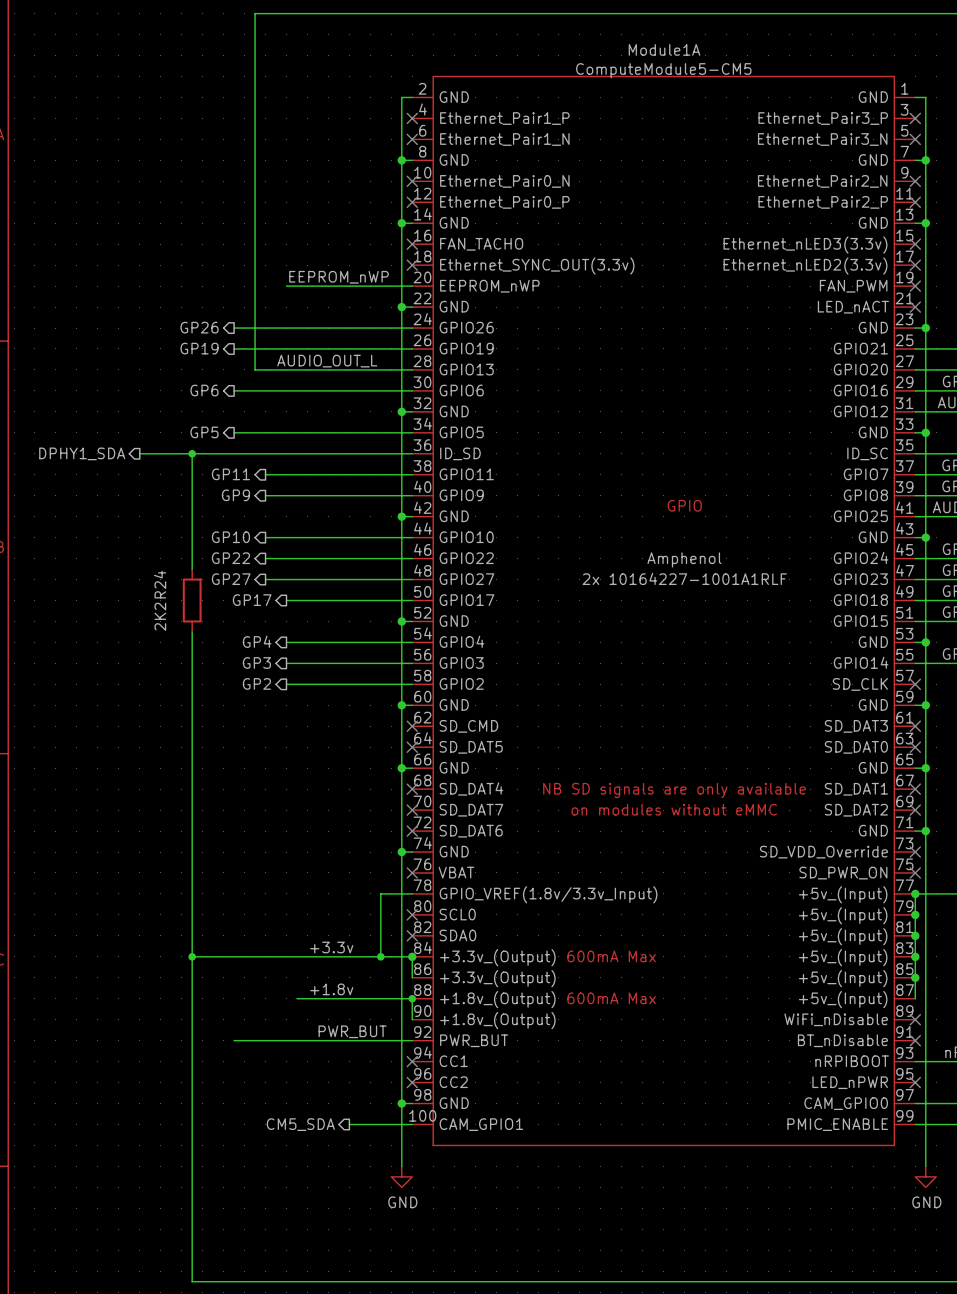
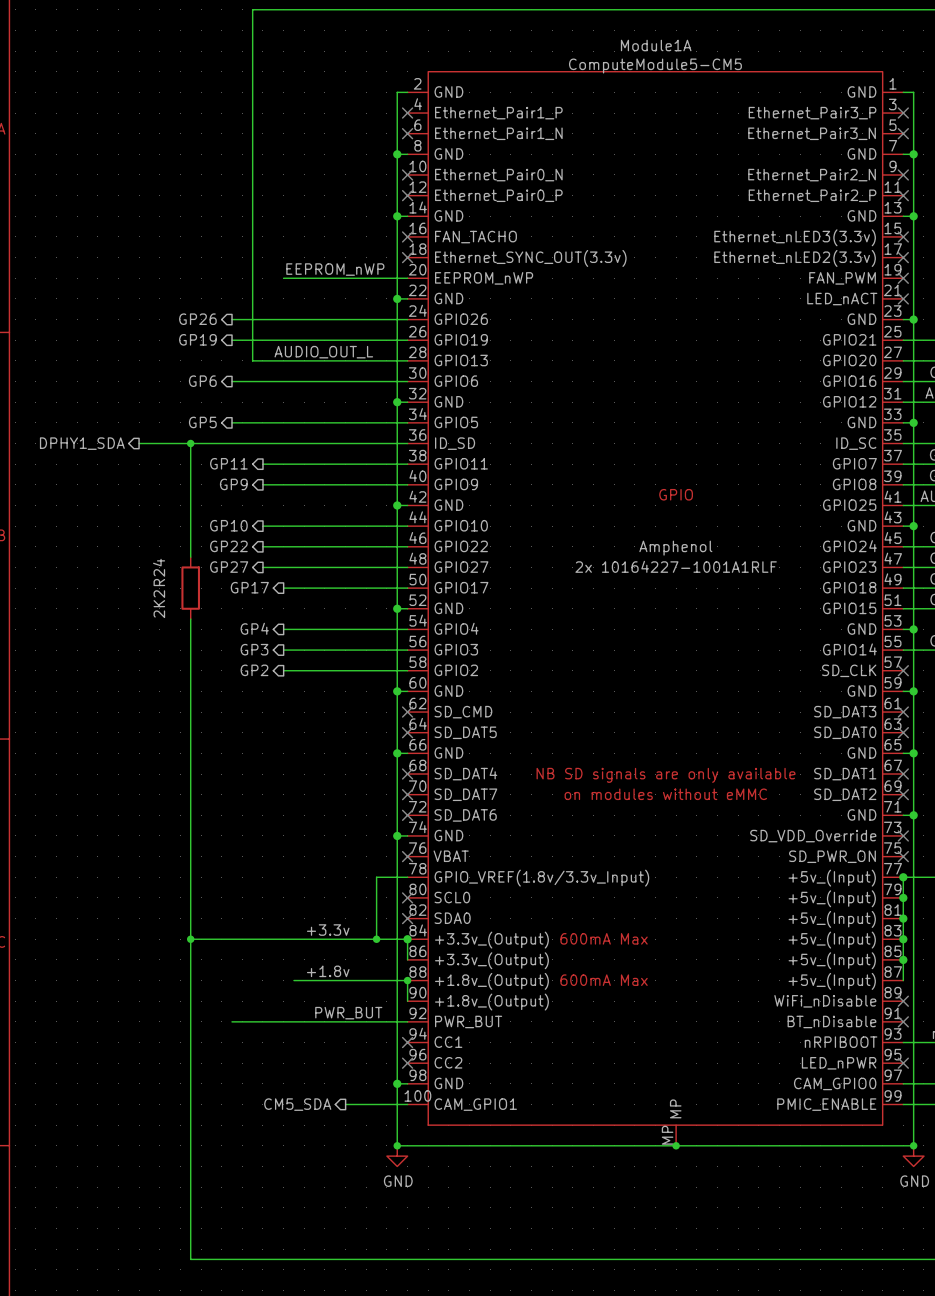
Module1A symbol: [412, 76, 916, 1146] -> [407, 71, 904, 1146]
wire: none -> (397, 1145) (913, 1145)
junction: none -> (397, 1145)
junction: none -> (676, 1145)
junction: none -> (913, 1145)

